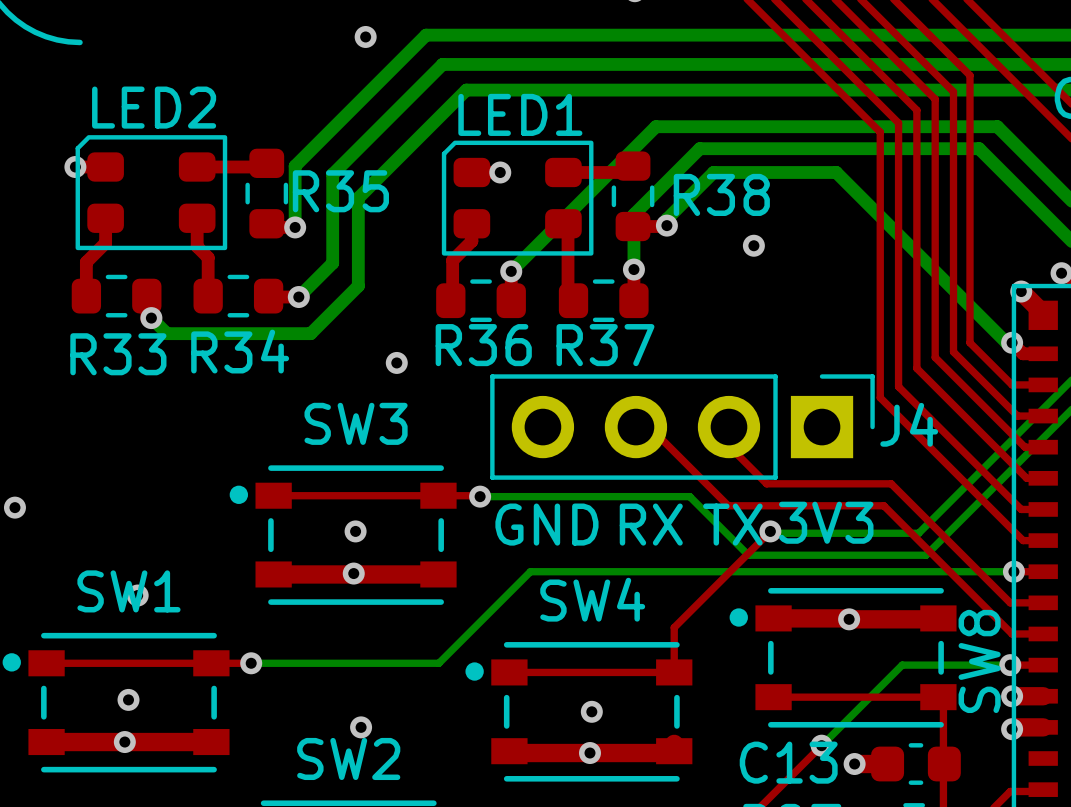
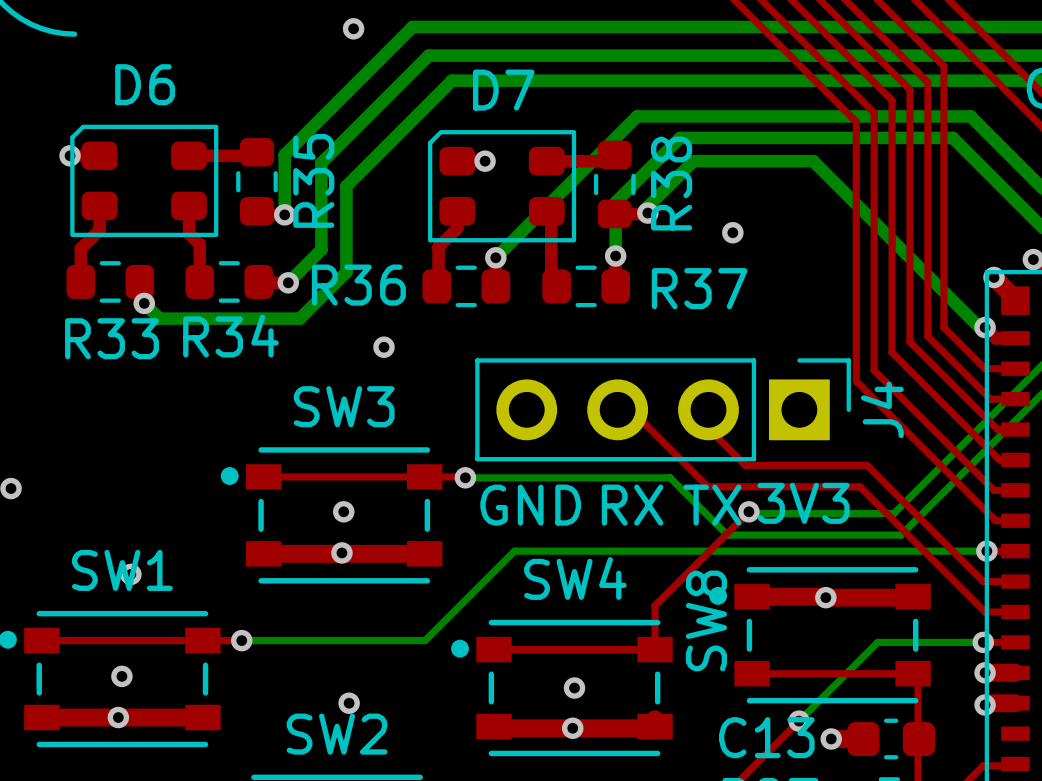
D6 name: none -> D6 (145, 84)
D7 name: none -> D7 (503, 90)
text: LED2 (154, 107) -> none
text: LED1 (520, 114) -> none
R35 name rotation: 0° (340, 191) -> 90° counterclockwise (313, 180)
R38 name rotation: 0° (721, 194) -> 90° counterclockwise (671, 183)
R36 name position: R36 (483, 345) -> R36 (358, 285)
R37 name position: R37 (605, 345) -> R37 (699, 288)
J4 name rotation: 0° (909, 424) -> 90° counterclockwise (882, 409)
SW8 name position: SW8 (979, 661) -> SW8 (706, 620)

